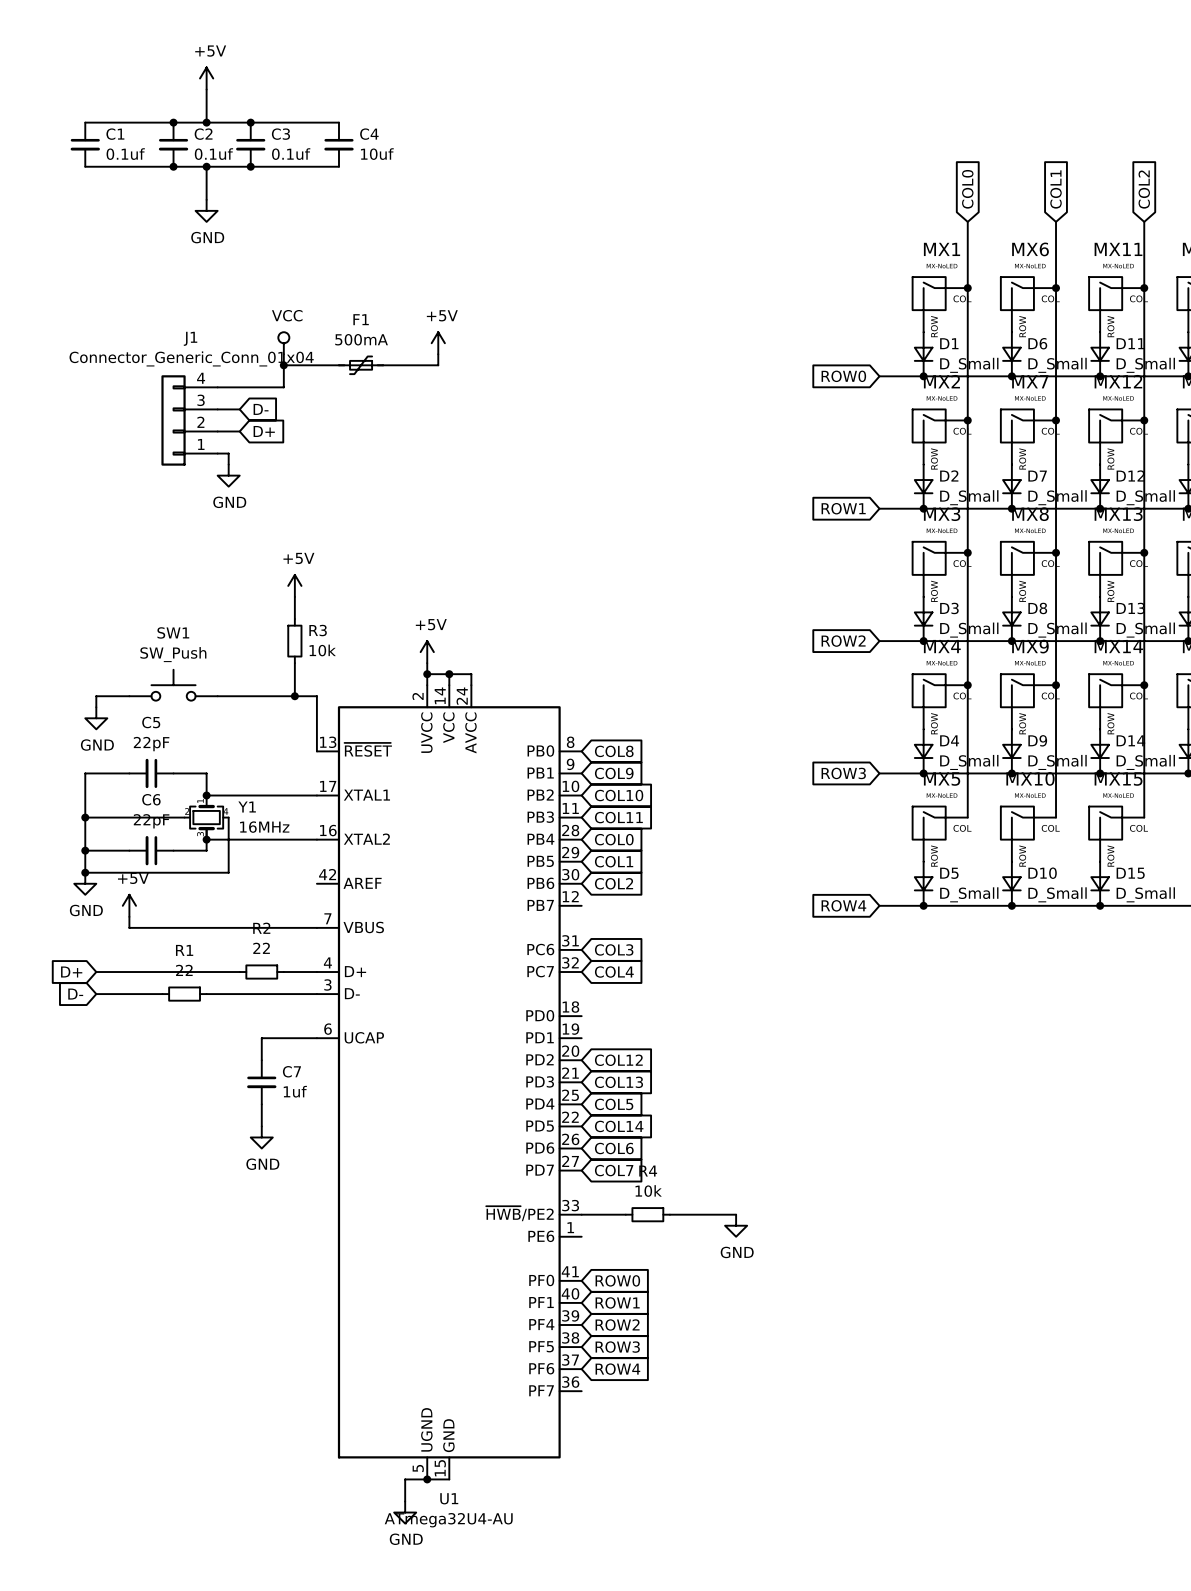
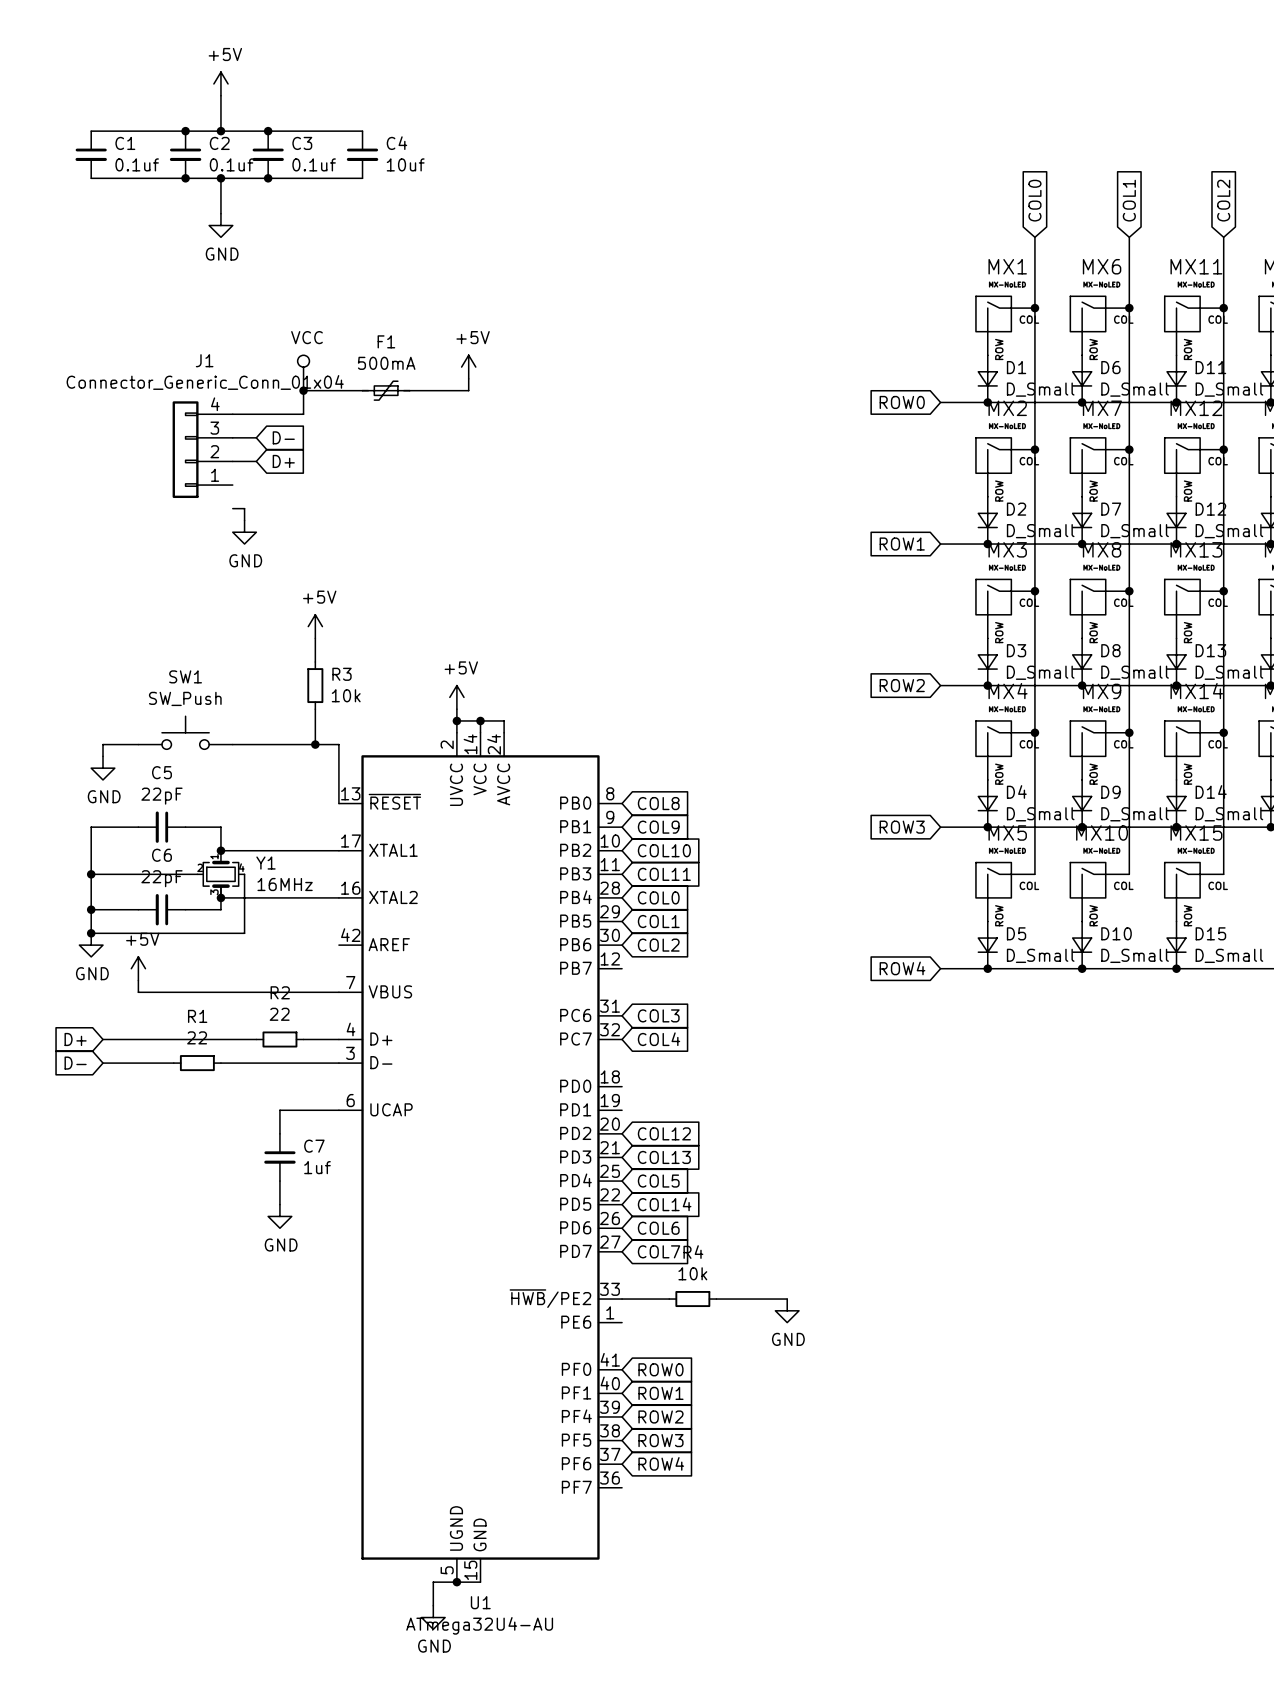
wire: (217, 453) (228, 453) (228, 464) -> (232, 508) (244, 508) (244, 520)
power symbol position: GND (228, 475) -> GND (244, 532)

